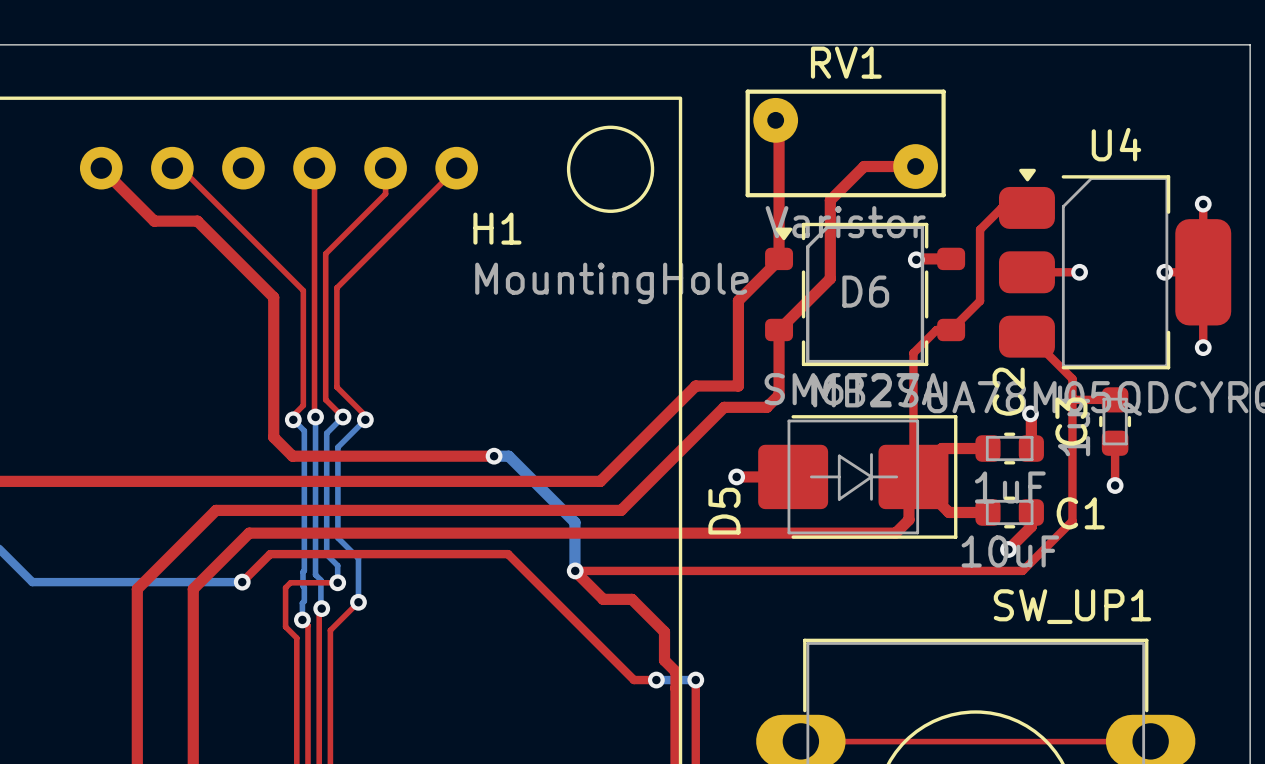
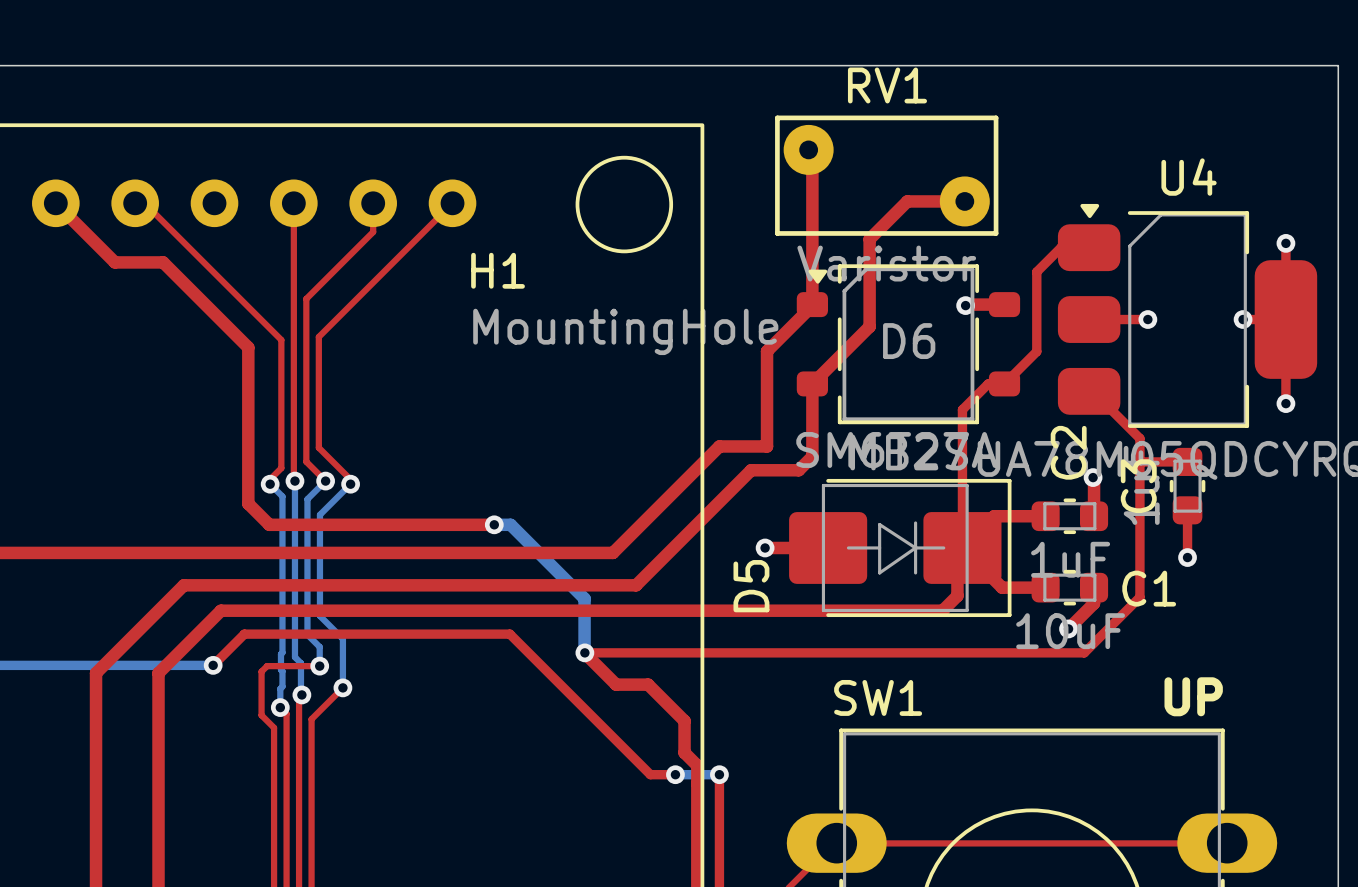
SW_UP1 name: SW_UP1 (1072, 606) -> SW1 (878, 697)
text: none -> UP (1193, 696)

